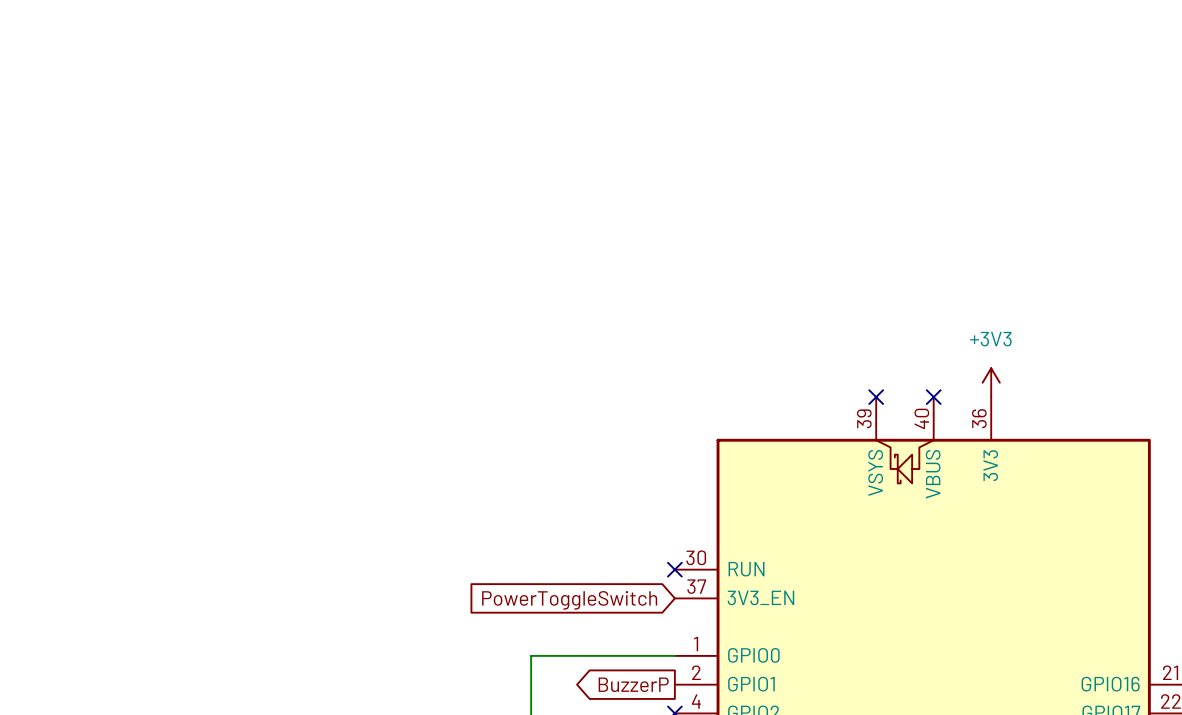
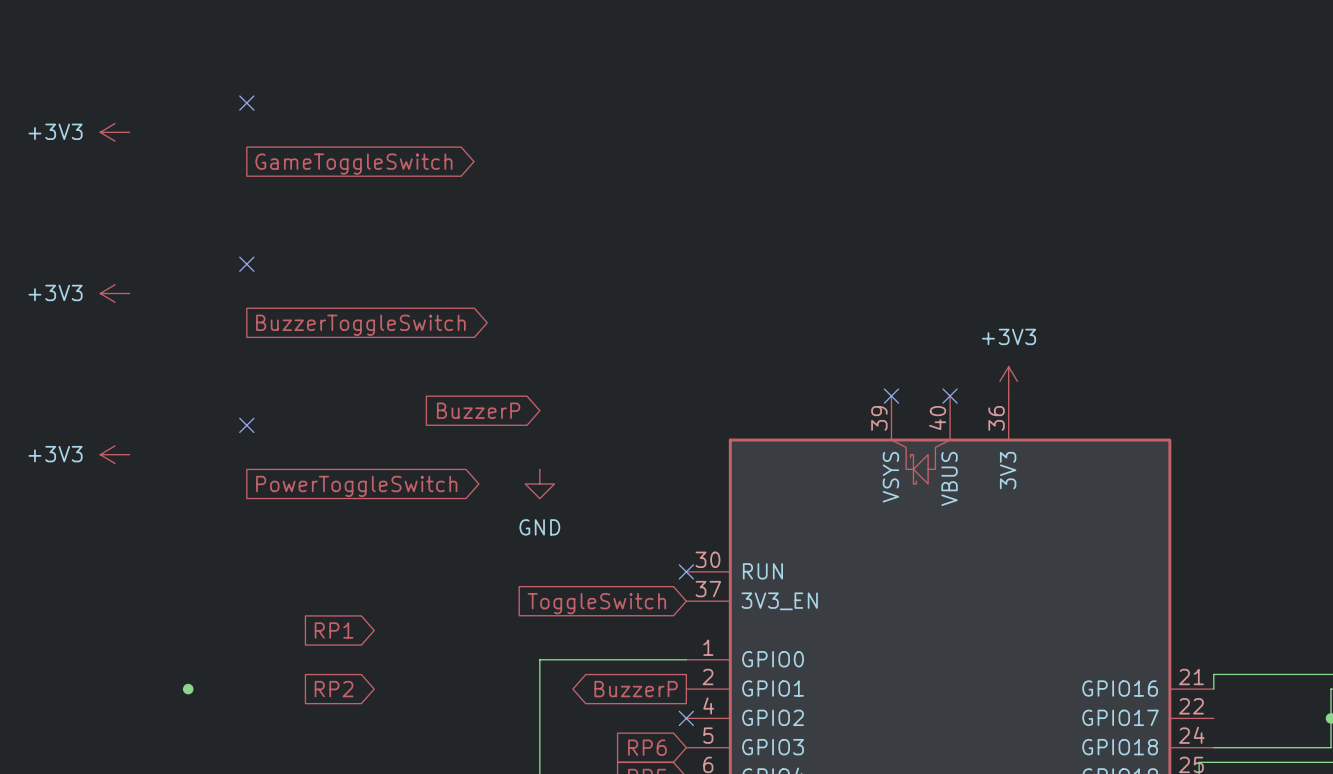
no-connect mark: none -> (246, 103)
power symbol: none -> +3V3 (114, 132)
global label: none -> GameToggleSwitch (353, 164)
no-connect mark: none -> (246, 264)
power symbol: none -> +3V3 (114, 293)
global label: none -> BuzzerToggleSwitch (360, 325)
global label: none -> BuzzerP (478, 410)
no-connect mark: none -> (246, 425)
power symbol: none -> +3V3 (114, 454)
power symbol: none -> GND (539, 483)
global label: none -> PowerToggleSwitch (356, 486)
global label: PowerToggleSwitch (569, 600) -> ToggleSwitch (596, 603)
global label: none -> RP1 (334, 630)
junction: none -> (188, 689)
global label: none -> RP2 (334, 689)

